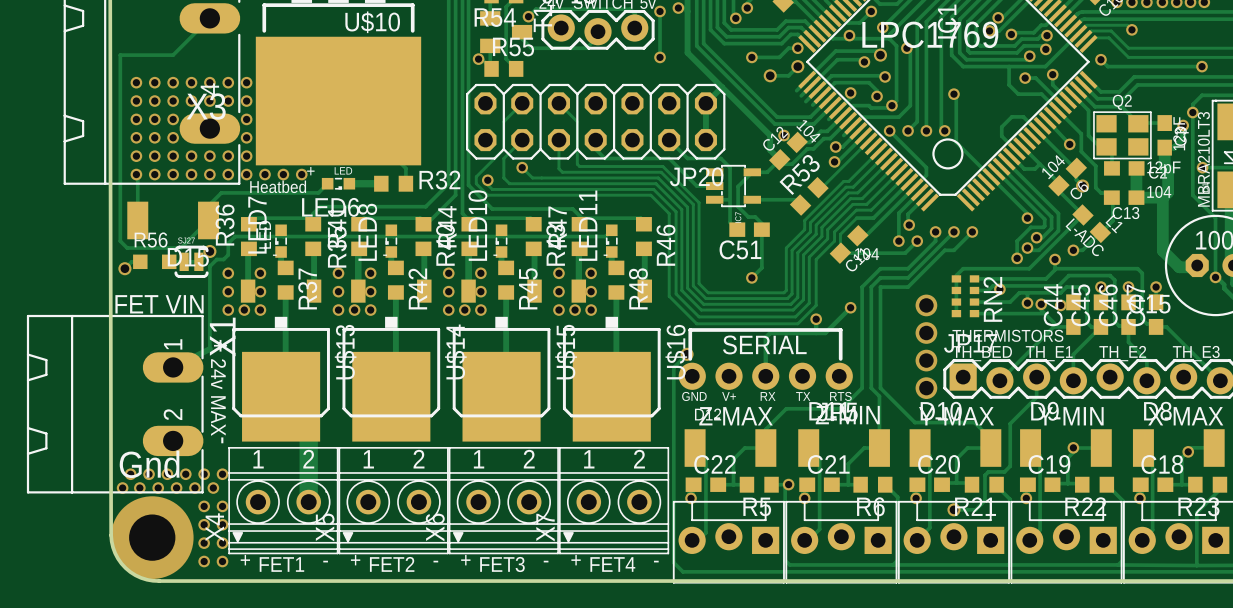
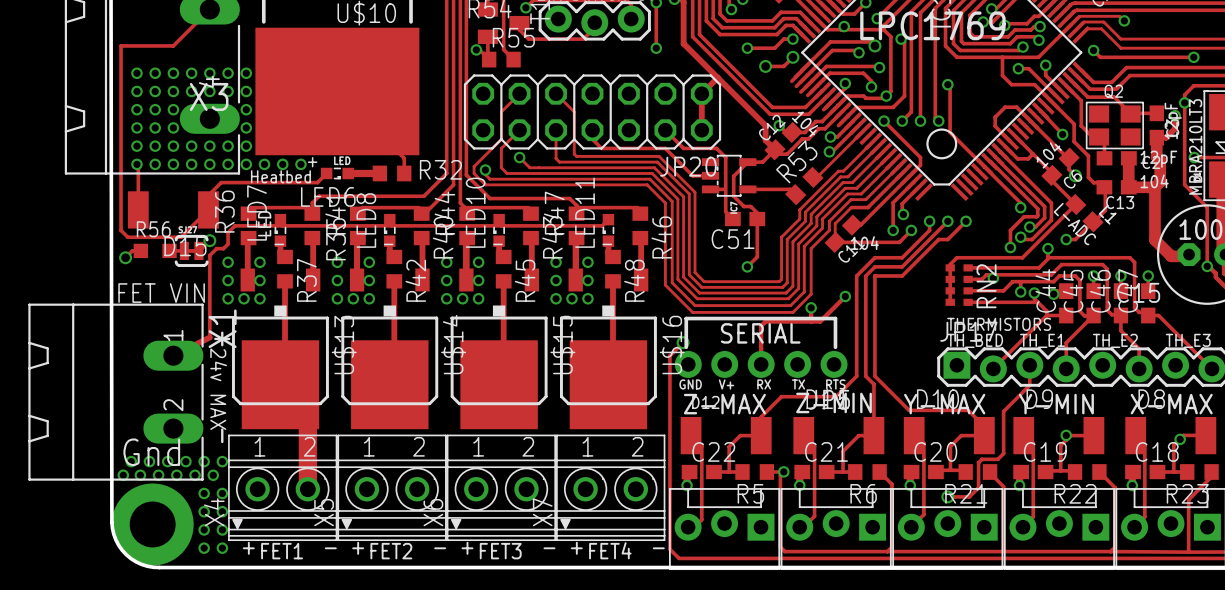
via: (926, 305) -> none
via: (926, 333) -> none
via: (926, 360) -> none
via: (926, 388) -> none

